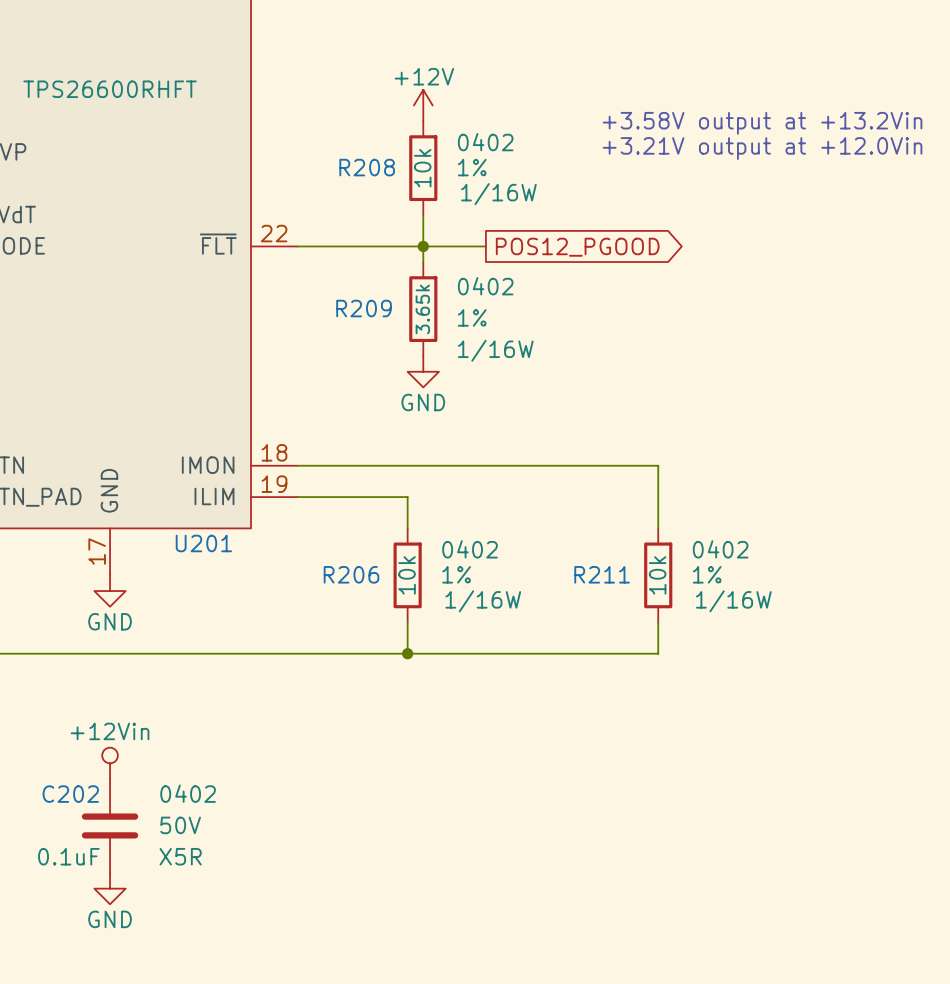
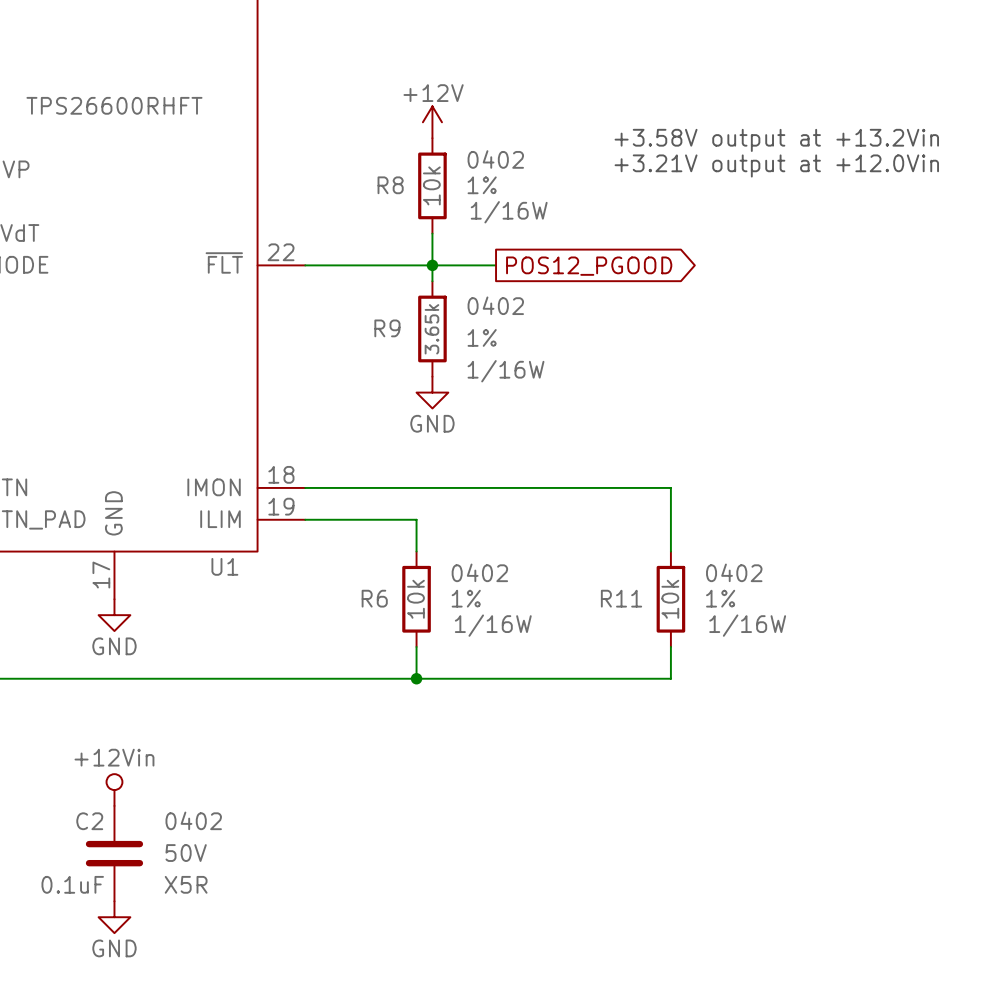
R208 name: R208 (367, 167) -> R8 (390, 185)
R209 name: R209 (364, 308) -> R9 (387, 328)
U201 name: U201 (203, 543) -> U1 (224, 566)
R206 name: R206 (351, 574) -> R6 (374, 598)
R211 name: R211 (602, 574) -> R11 (621, 598)
C202 name: C202 (70, 794) -> C2 (89, 821)

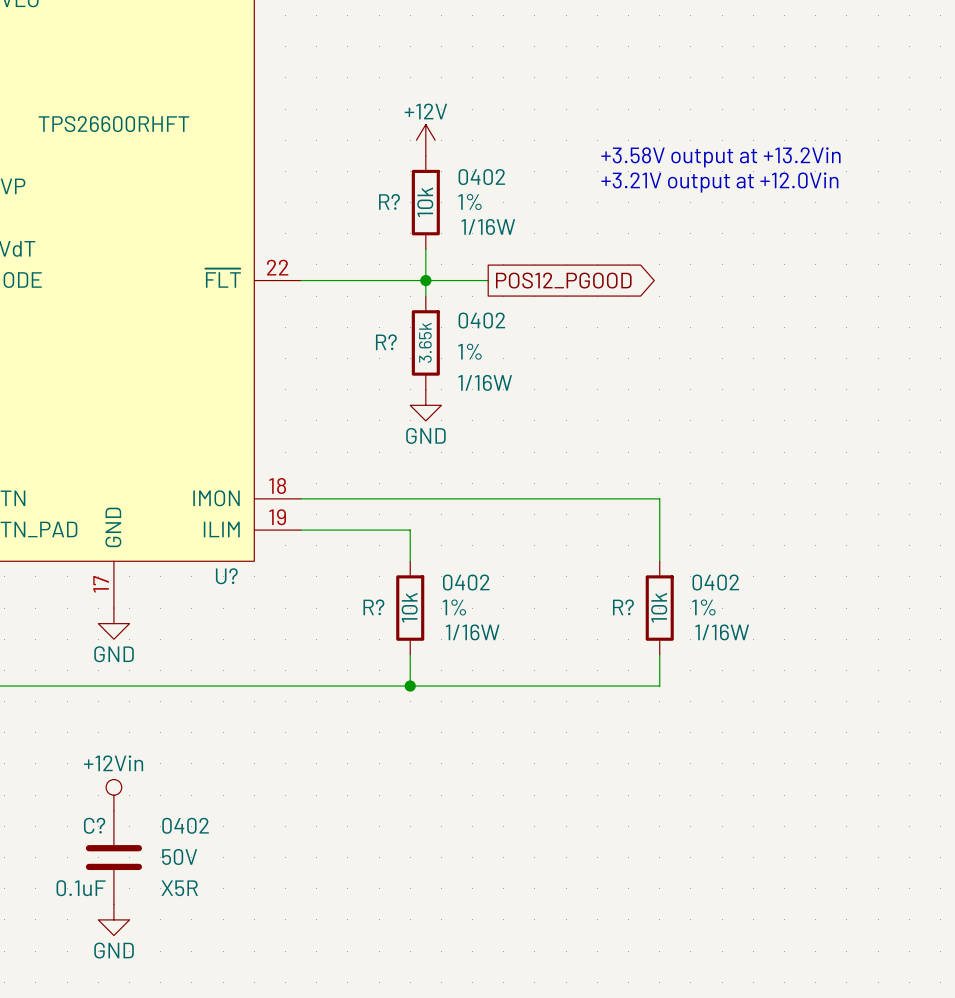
R8 name: R8 (390, 185) -> R? (389, 201)
R9 name: R9 (387, 328) -> R? (386, 342)
U1 name: U1 (224, 566) -> U? (226, 576)
R6 name: R6 (374, 598) -> R? (373, 607)
R11 name: R11 (621, 598) -> R? (623, 607)
C2 name: C2 (89, 821) -> C? (94, 825)

